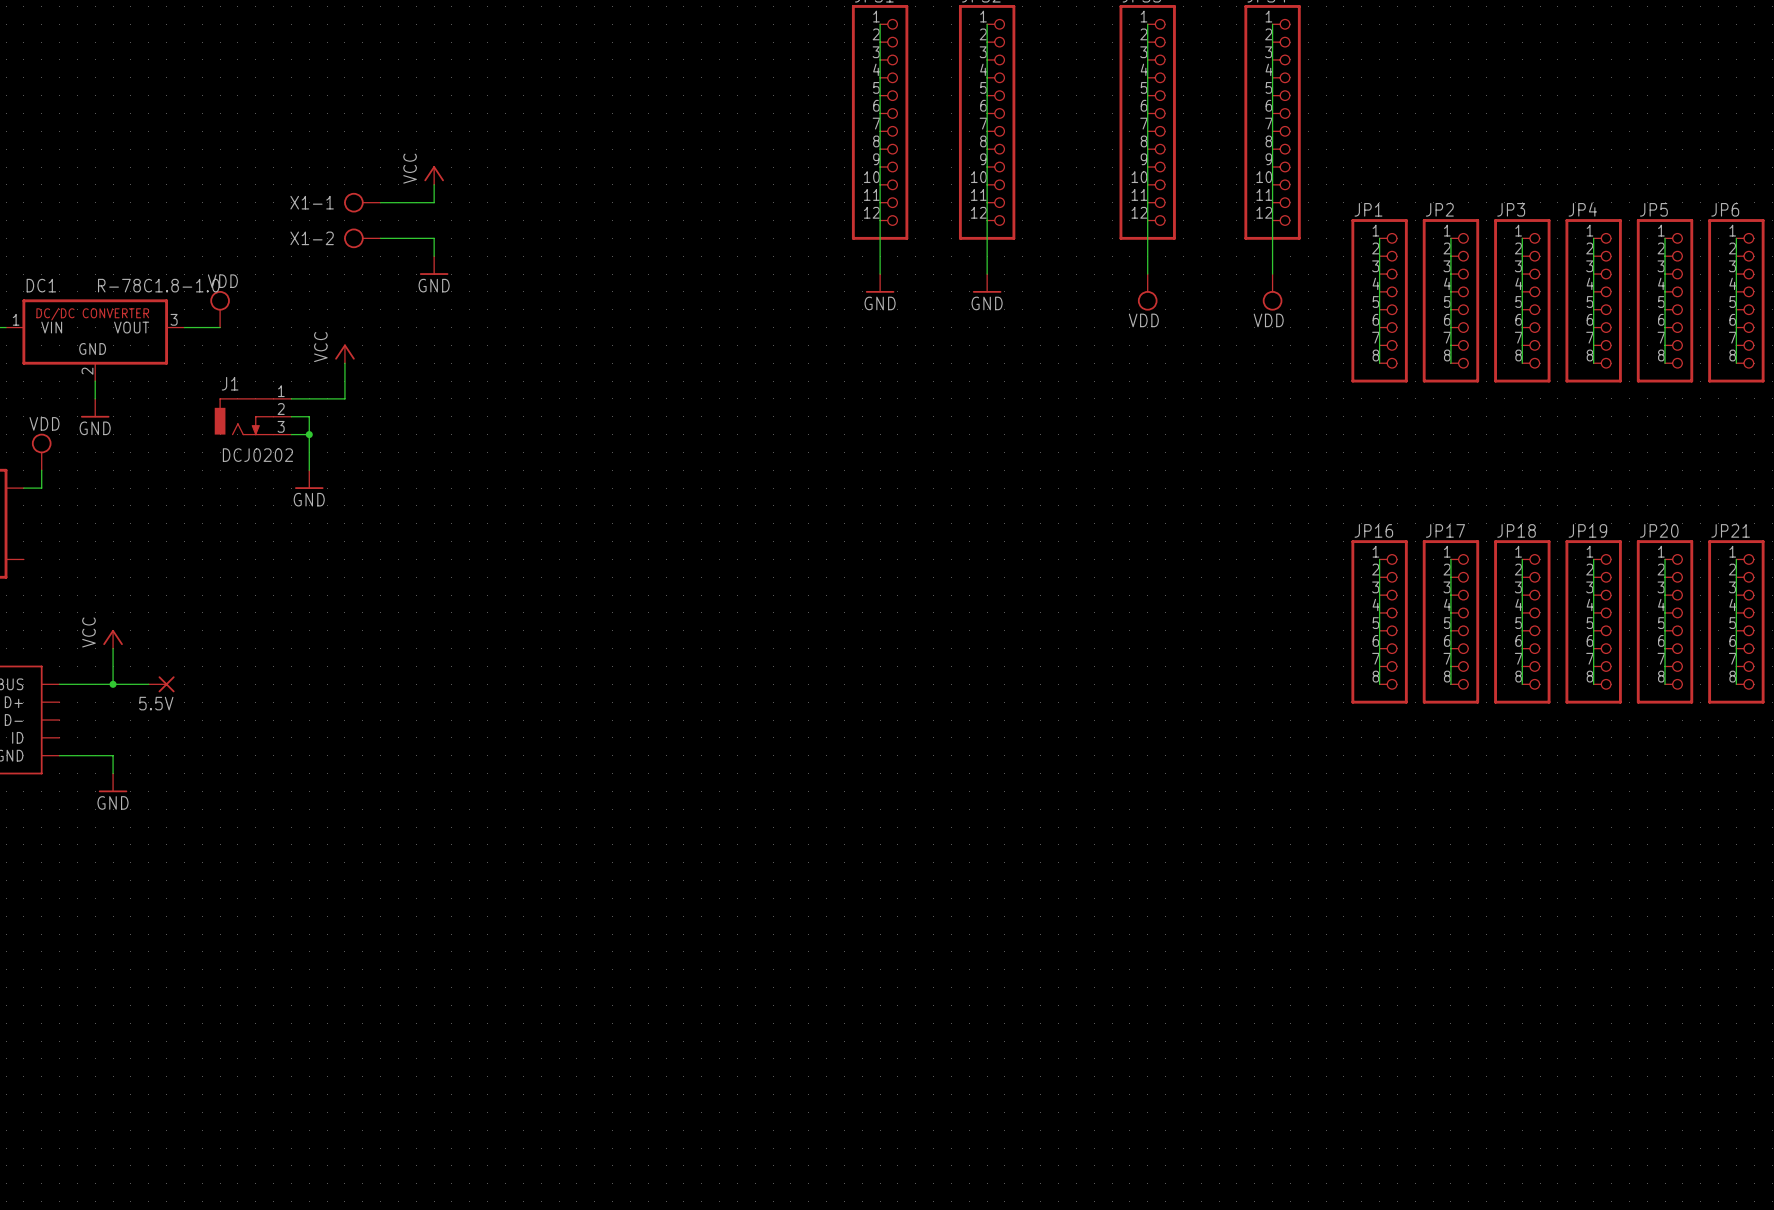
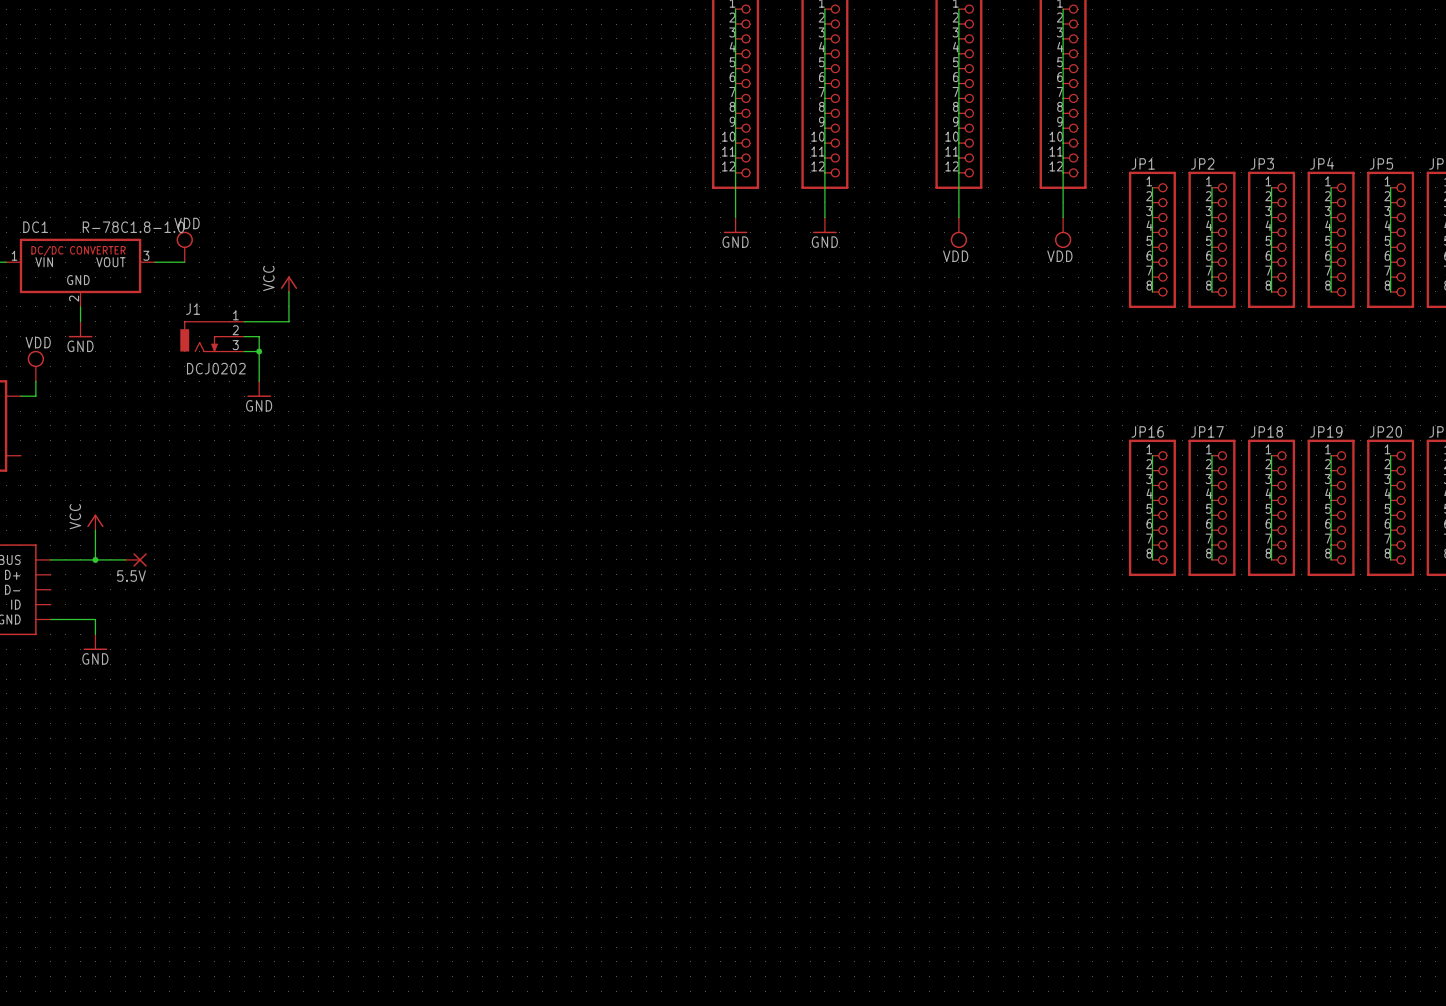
power symbol: VCC (434, 175) -> none
wire: (434, 184) (434, 202) (380, 202) -> none
X1-1: (362, 202) -> none
X1-2: (362, 238) -> none
wire: (380, 238) (434, 238) (434, 256) -> none
power symbol: GND (434, 265) -> none

